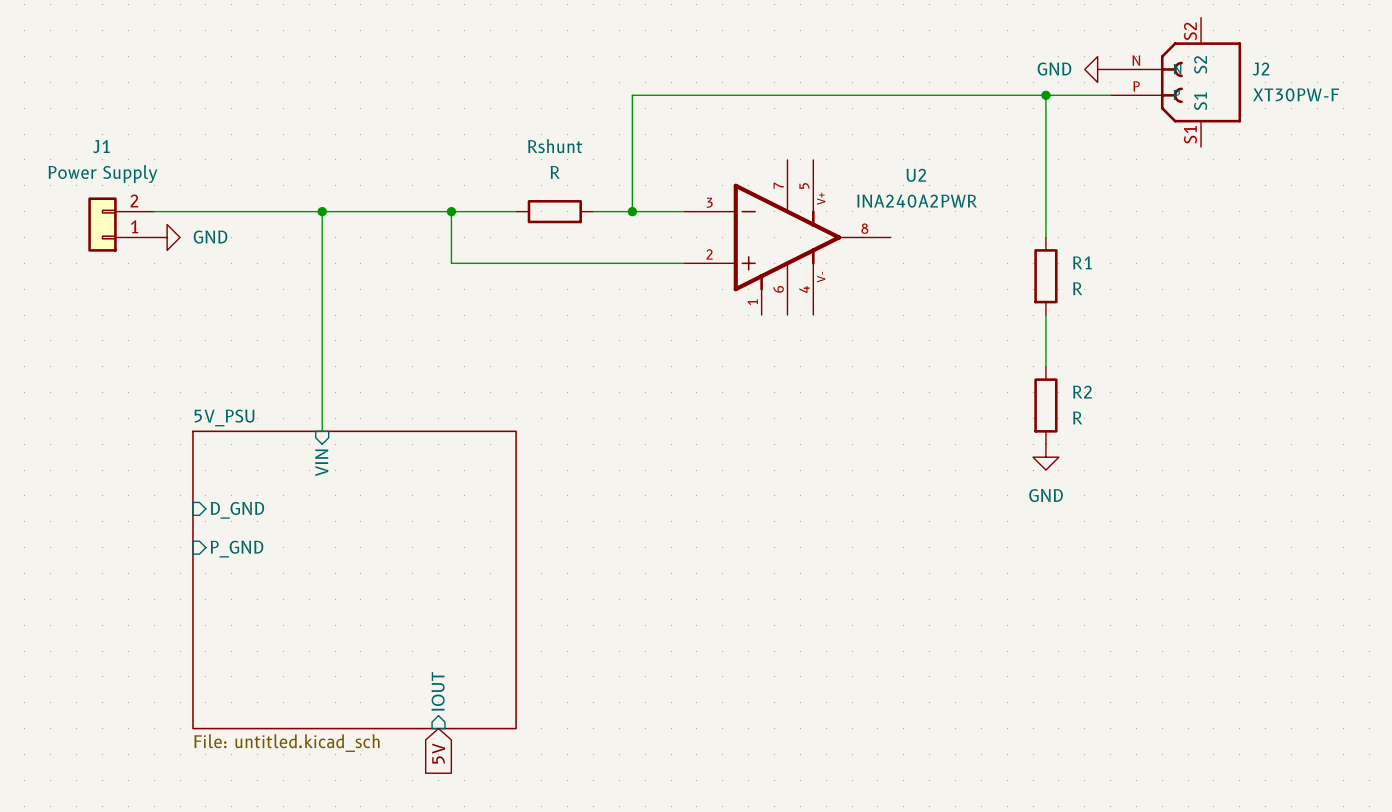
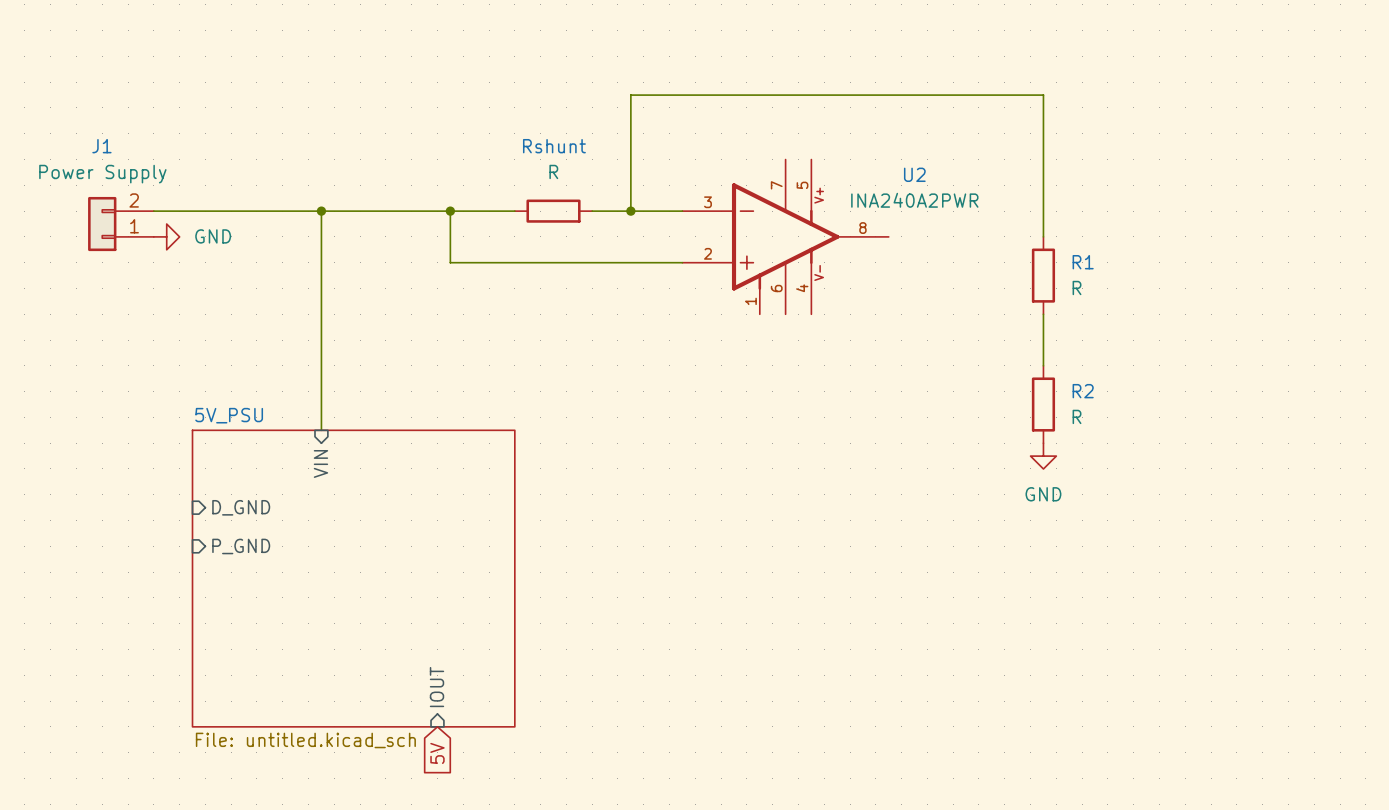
power symbol: GND (1097, 69) -> none
J2: XT30PW-F (1175, 82) -> none
wire: (1045, 95) (1110, 95) -> none
junction: (1045, 95) -> none

